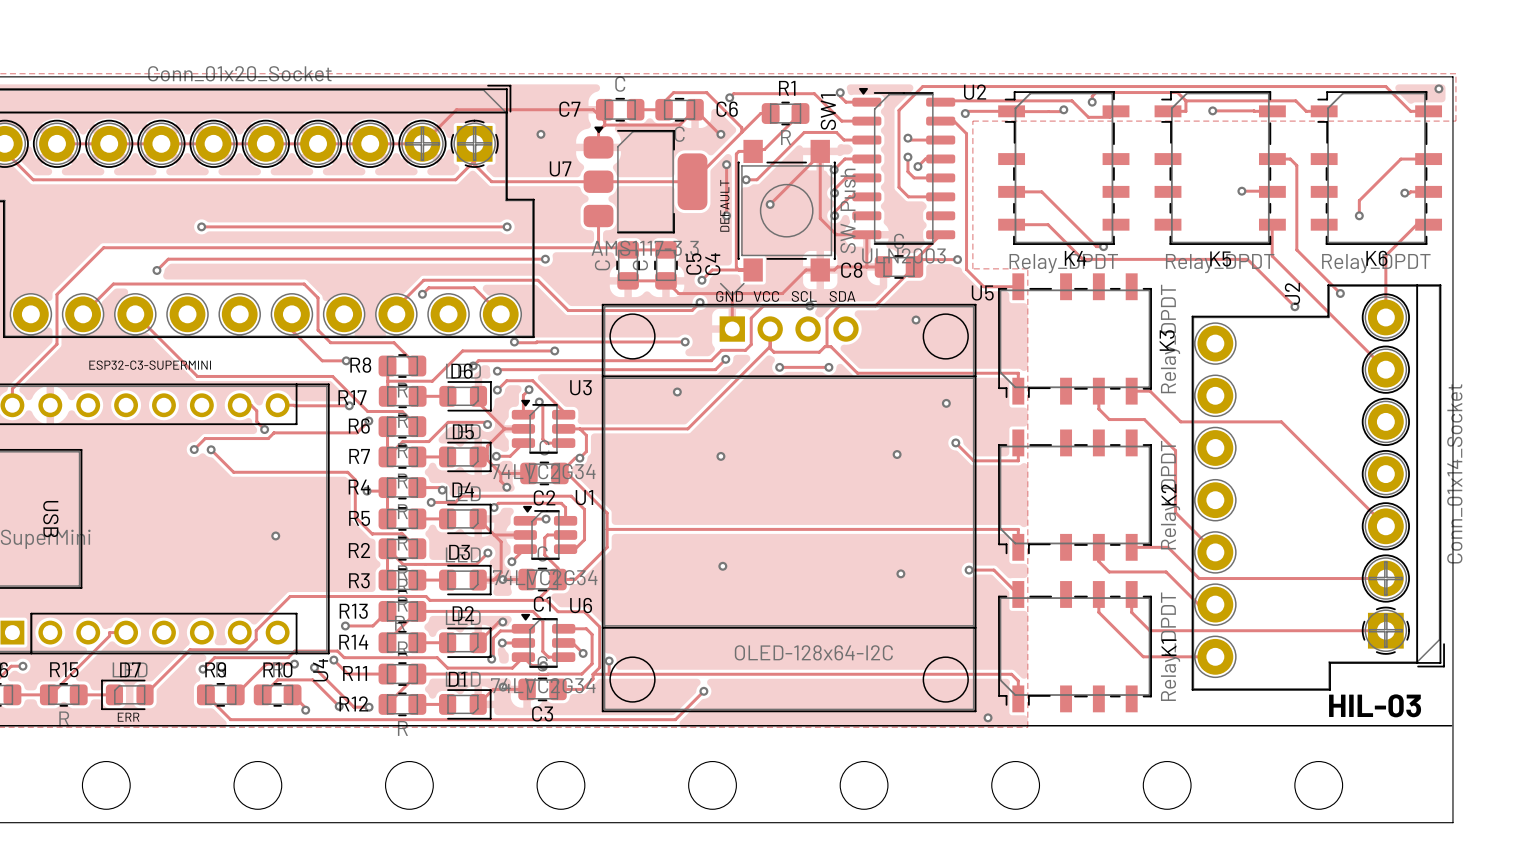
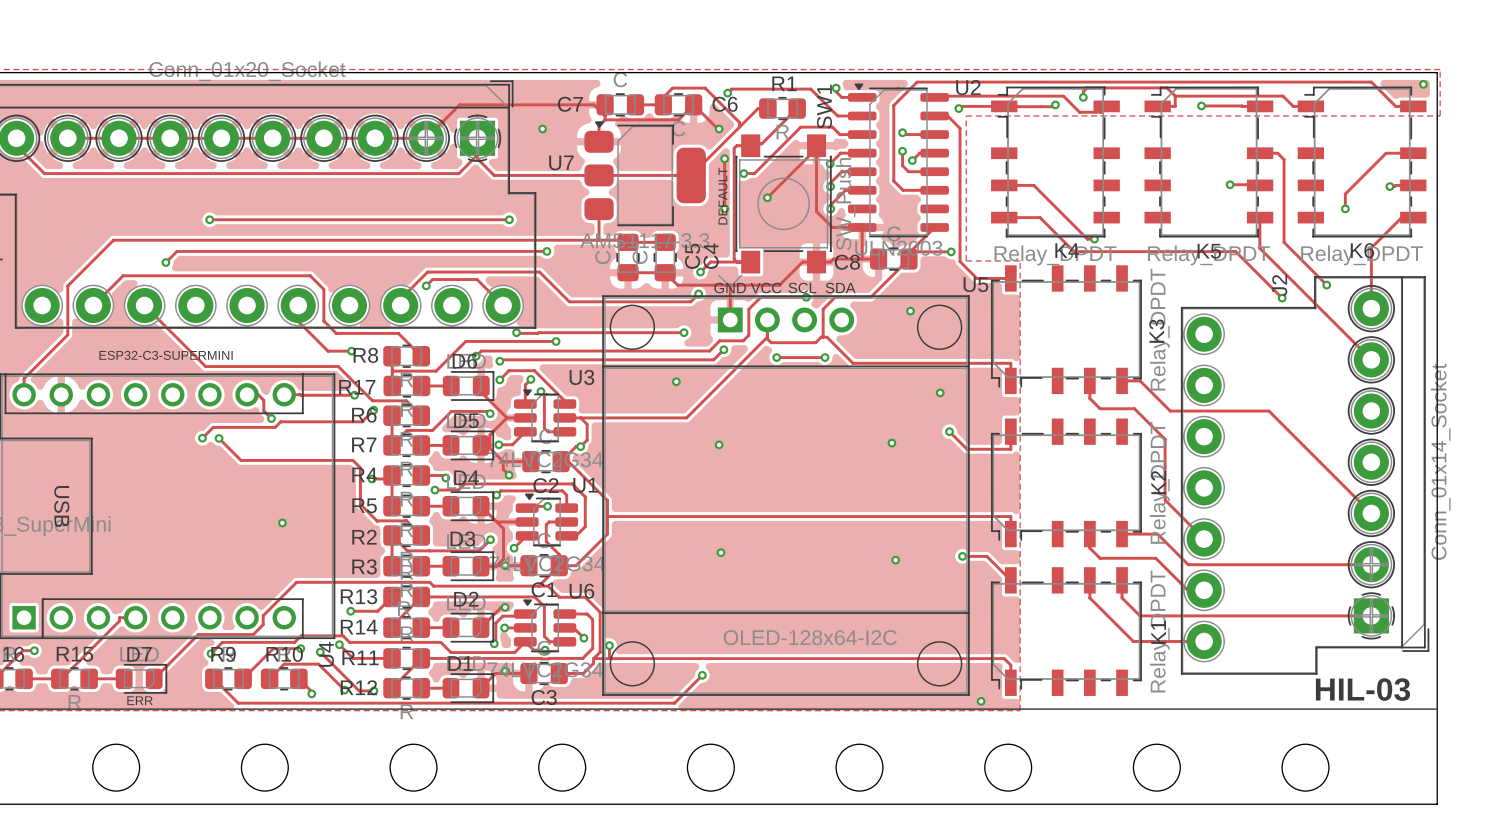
D7 rotation: 0° (127, 694) -> 180° (141, 678)

